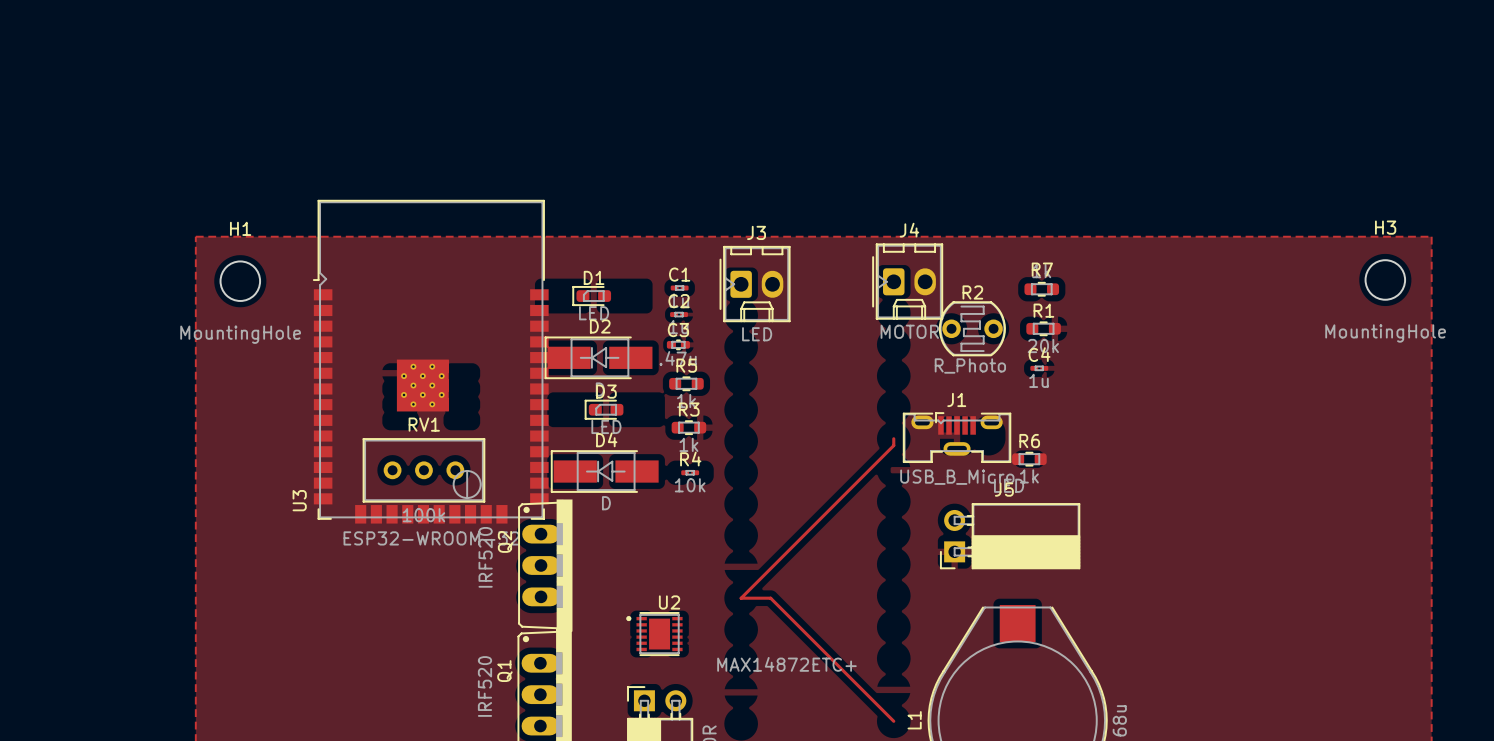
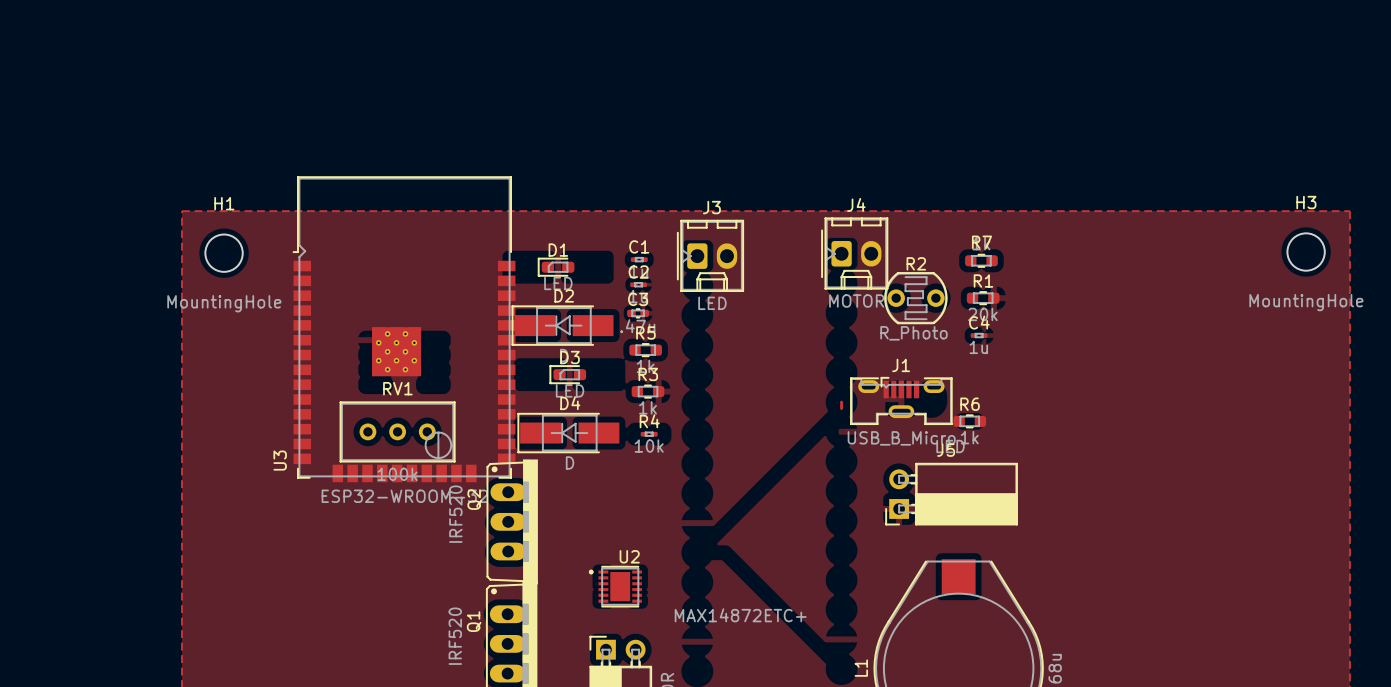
track: (893, 445) (741, 598) (770, 598) (893, 721) -> none

